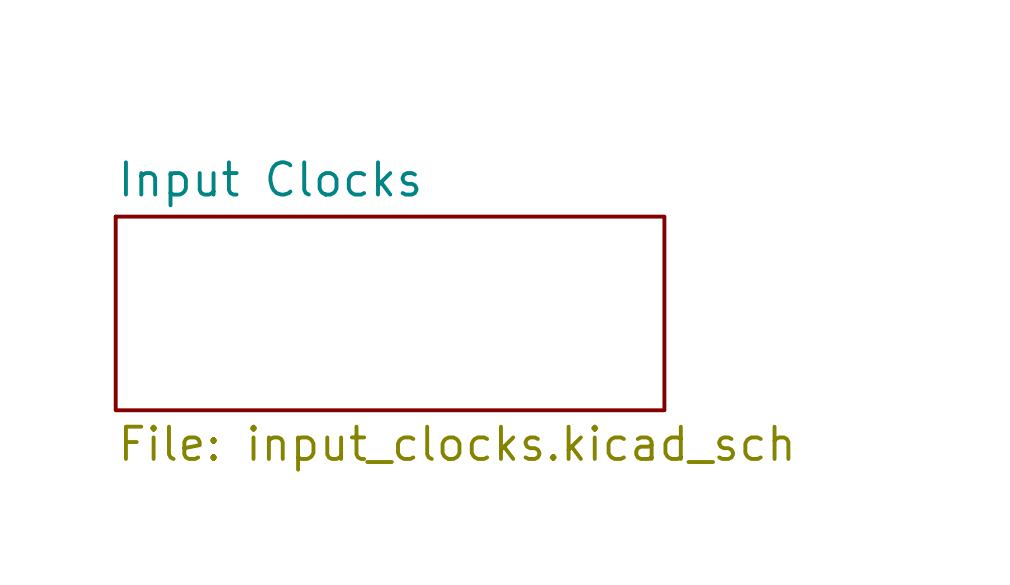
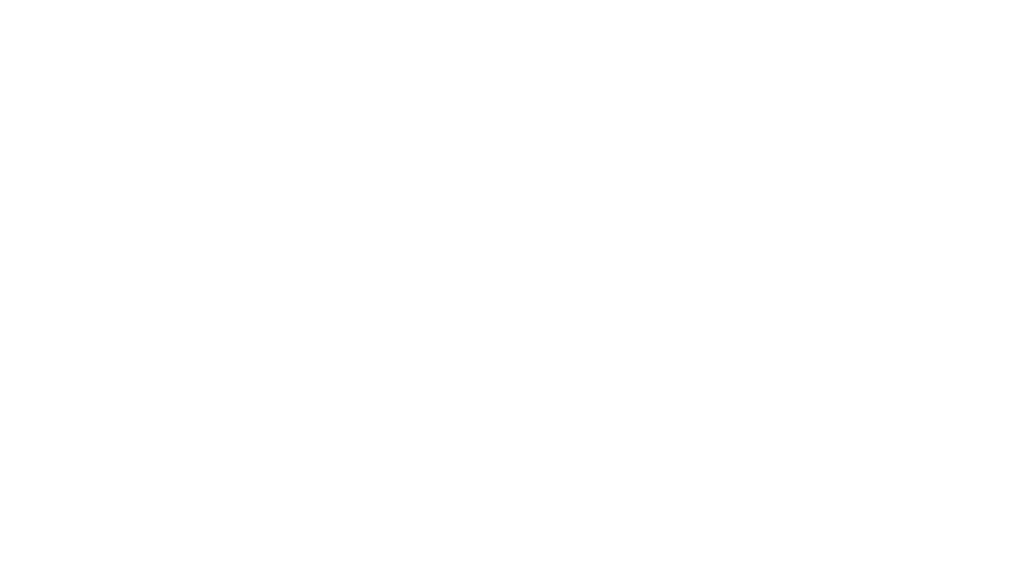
sheet Input Clocks: File: input_clocks.kicad_sch (390, 313) -> none

